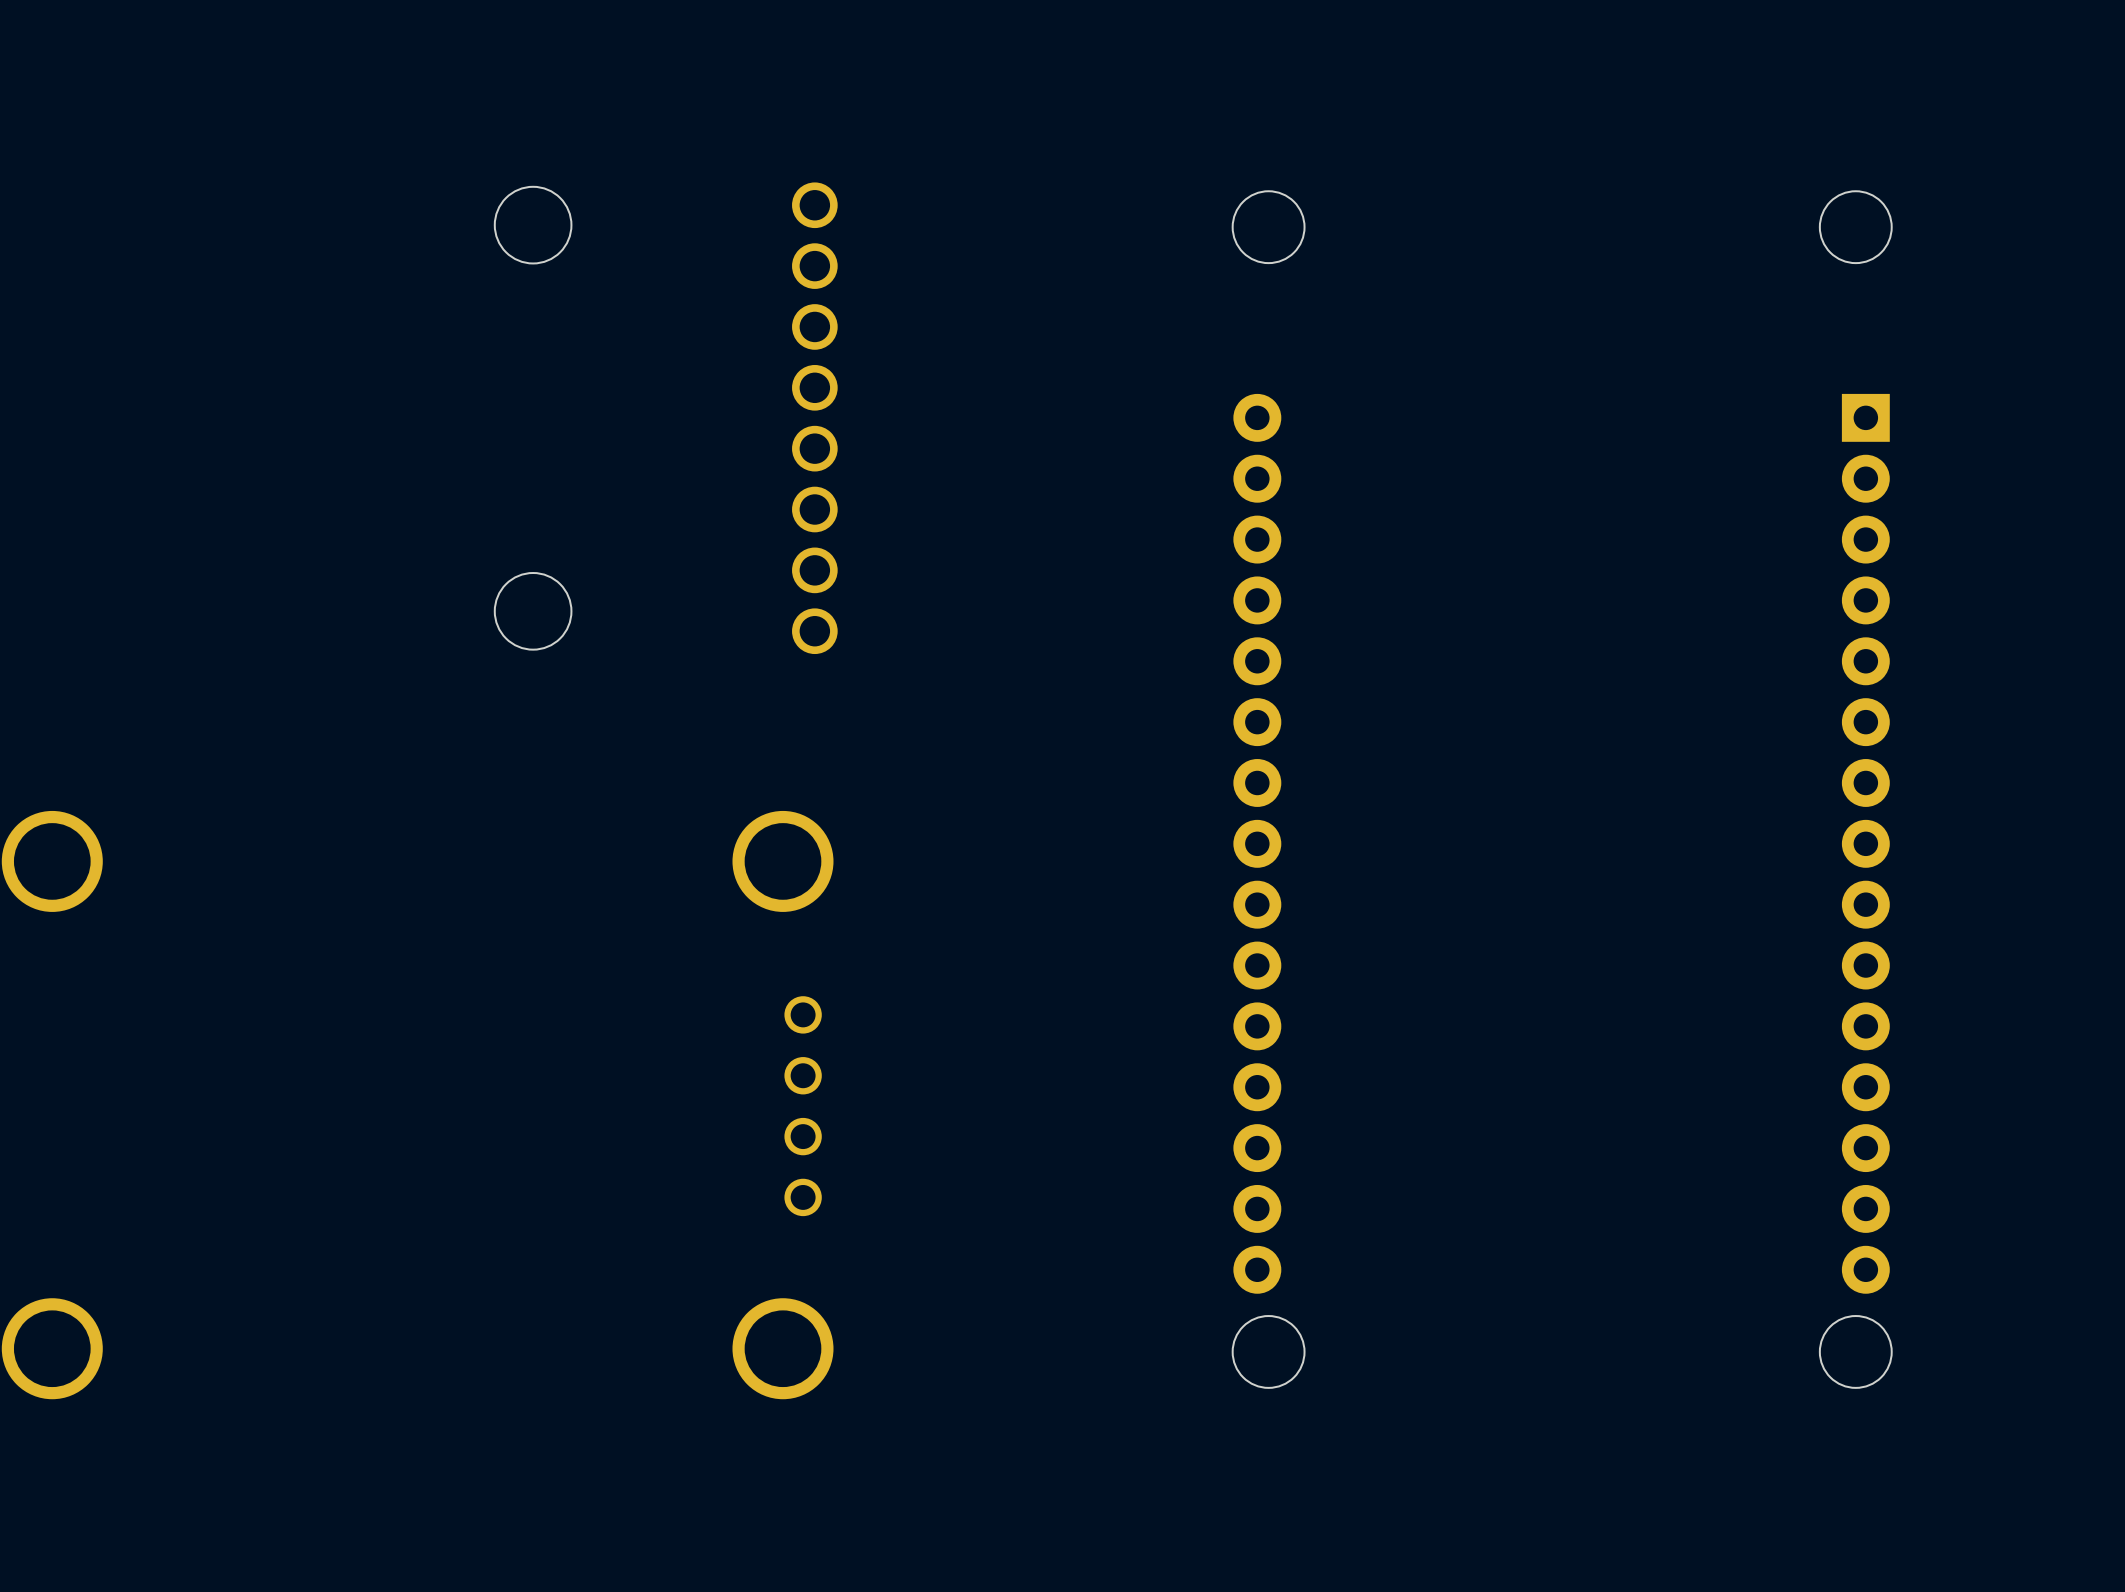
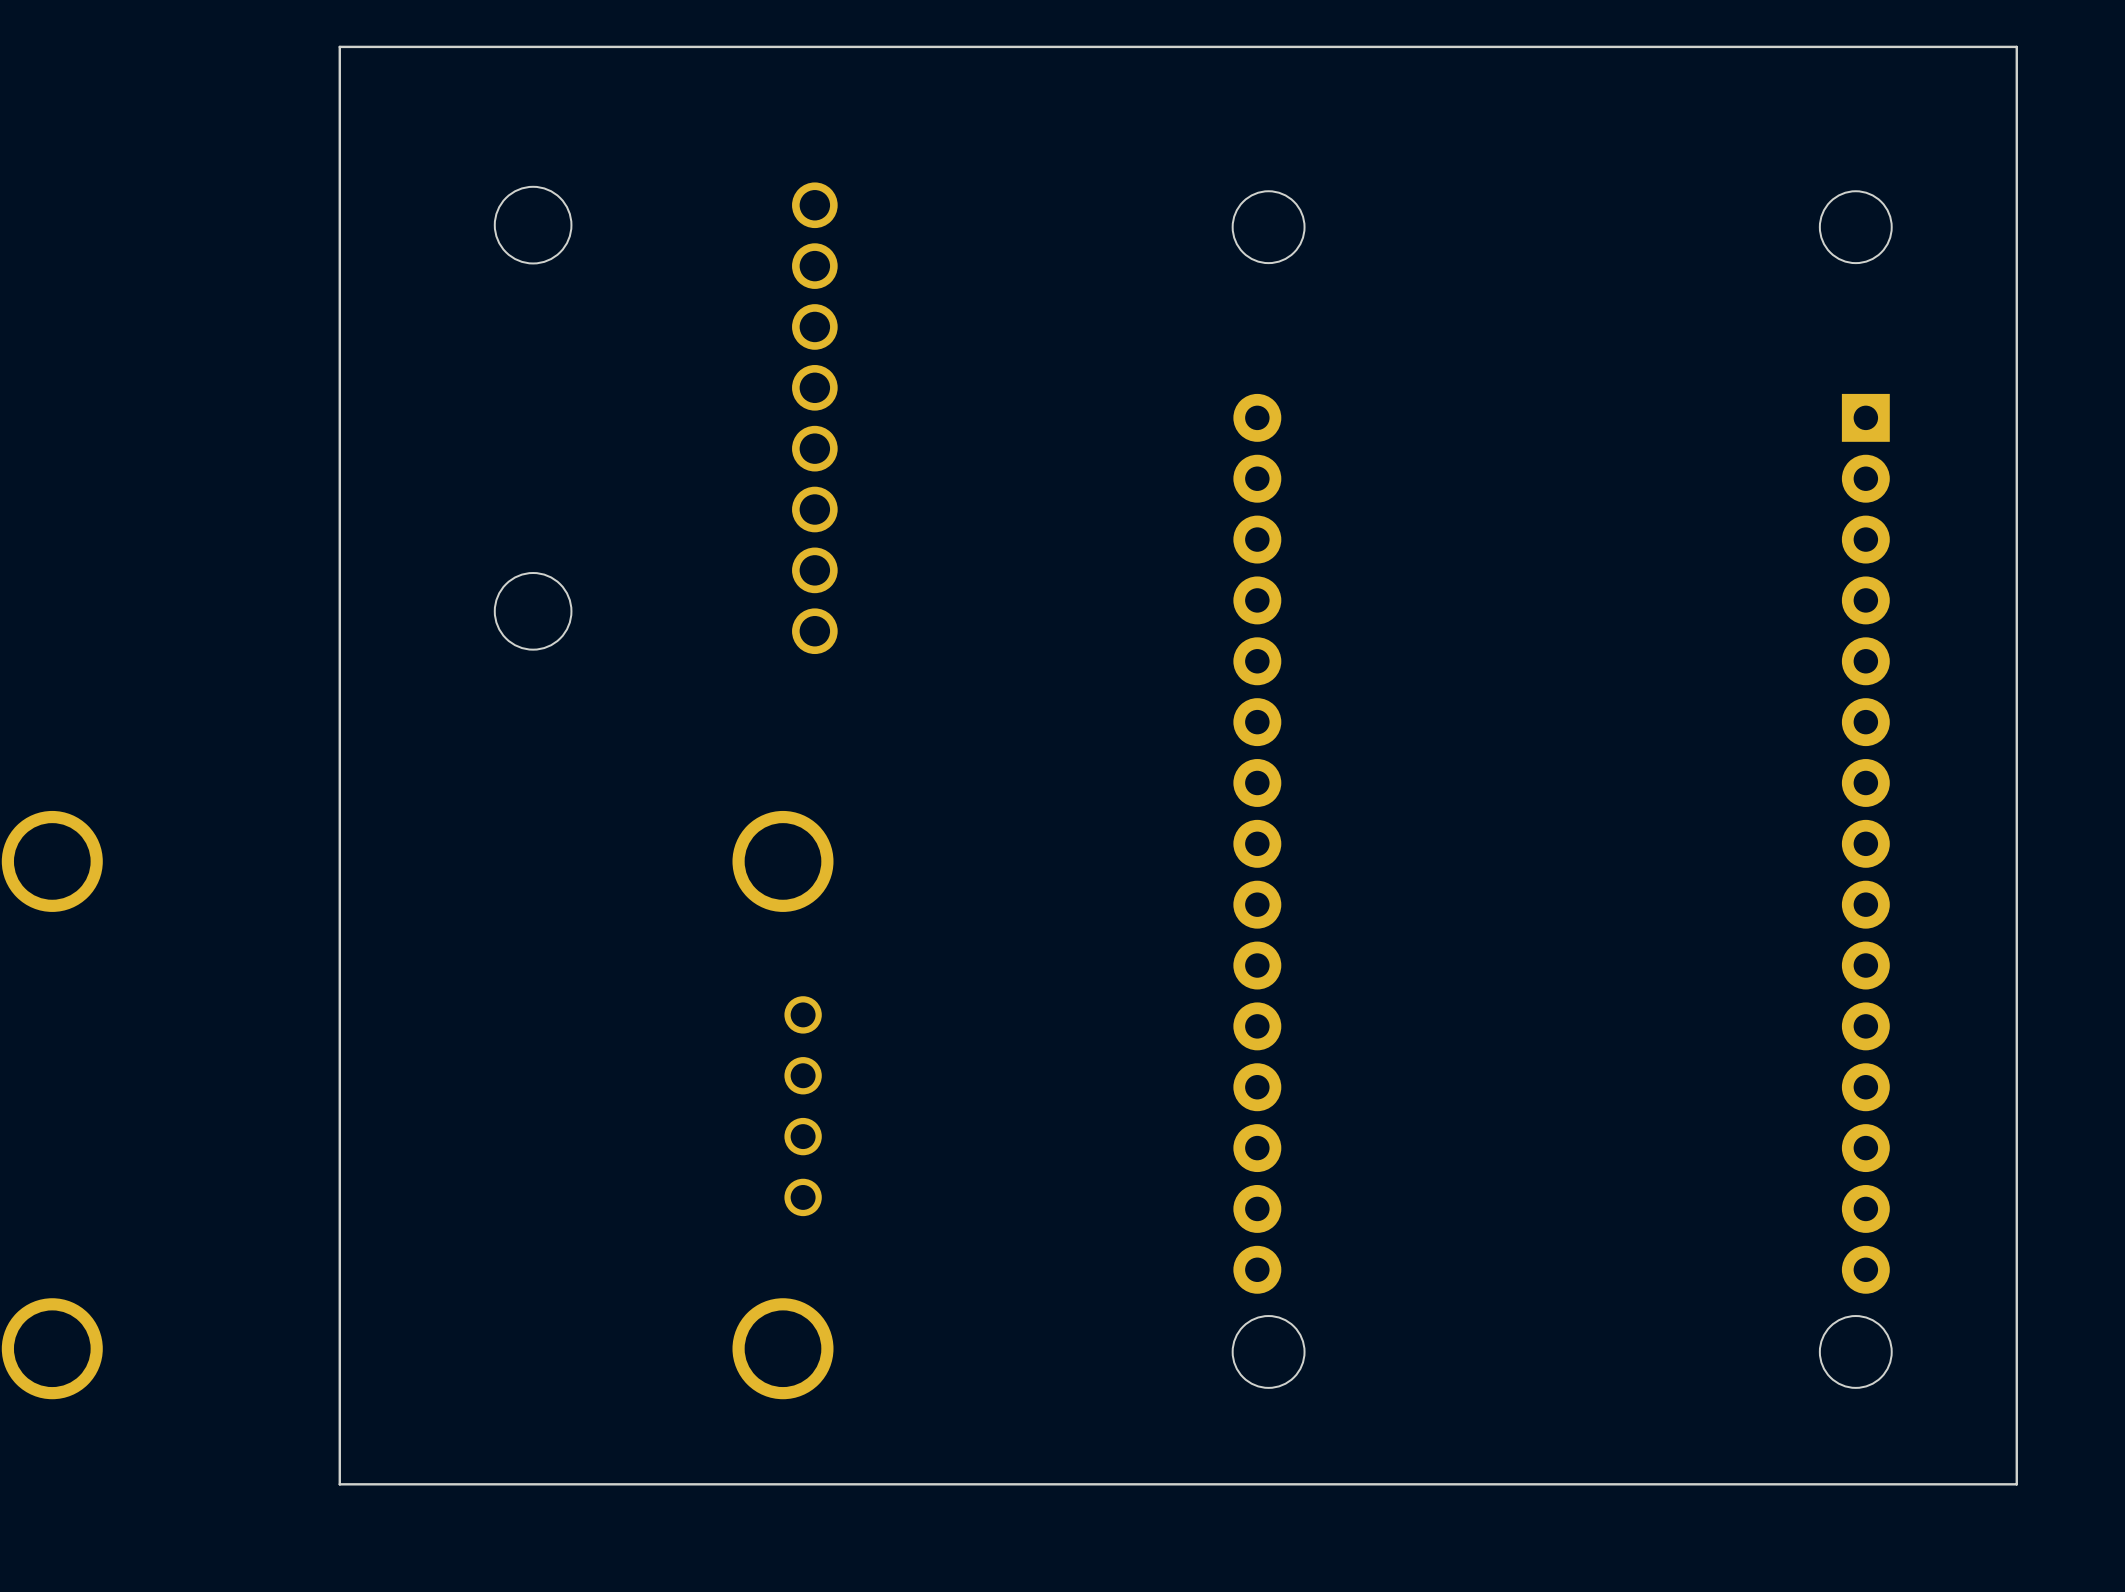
board edge: none -> (2016, 46) (339, 46) (339, 1484) (2016, 1484) (2016, 46)

